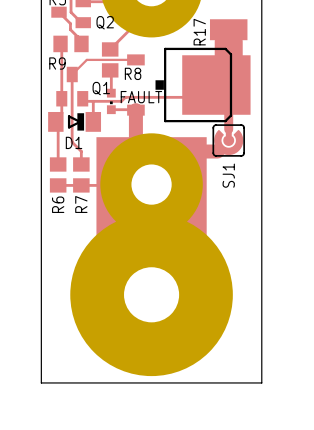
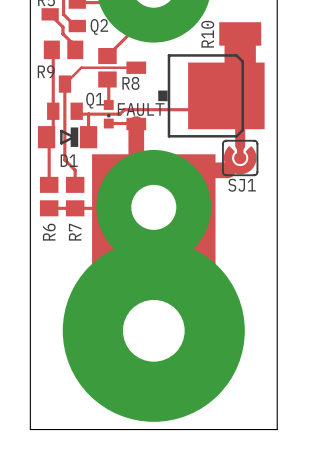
R17 name: R17 (199, 32) -> R10 (207, 34)
SJ1 name rotation: 0° (228, 175) -> 90° clockwise (242, 185)

